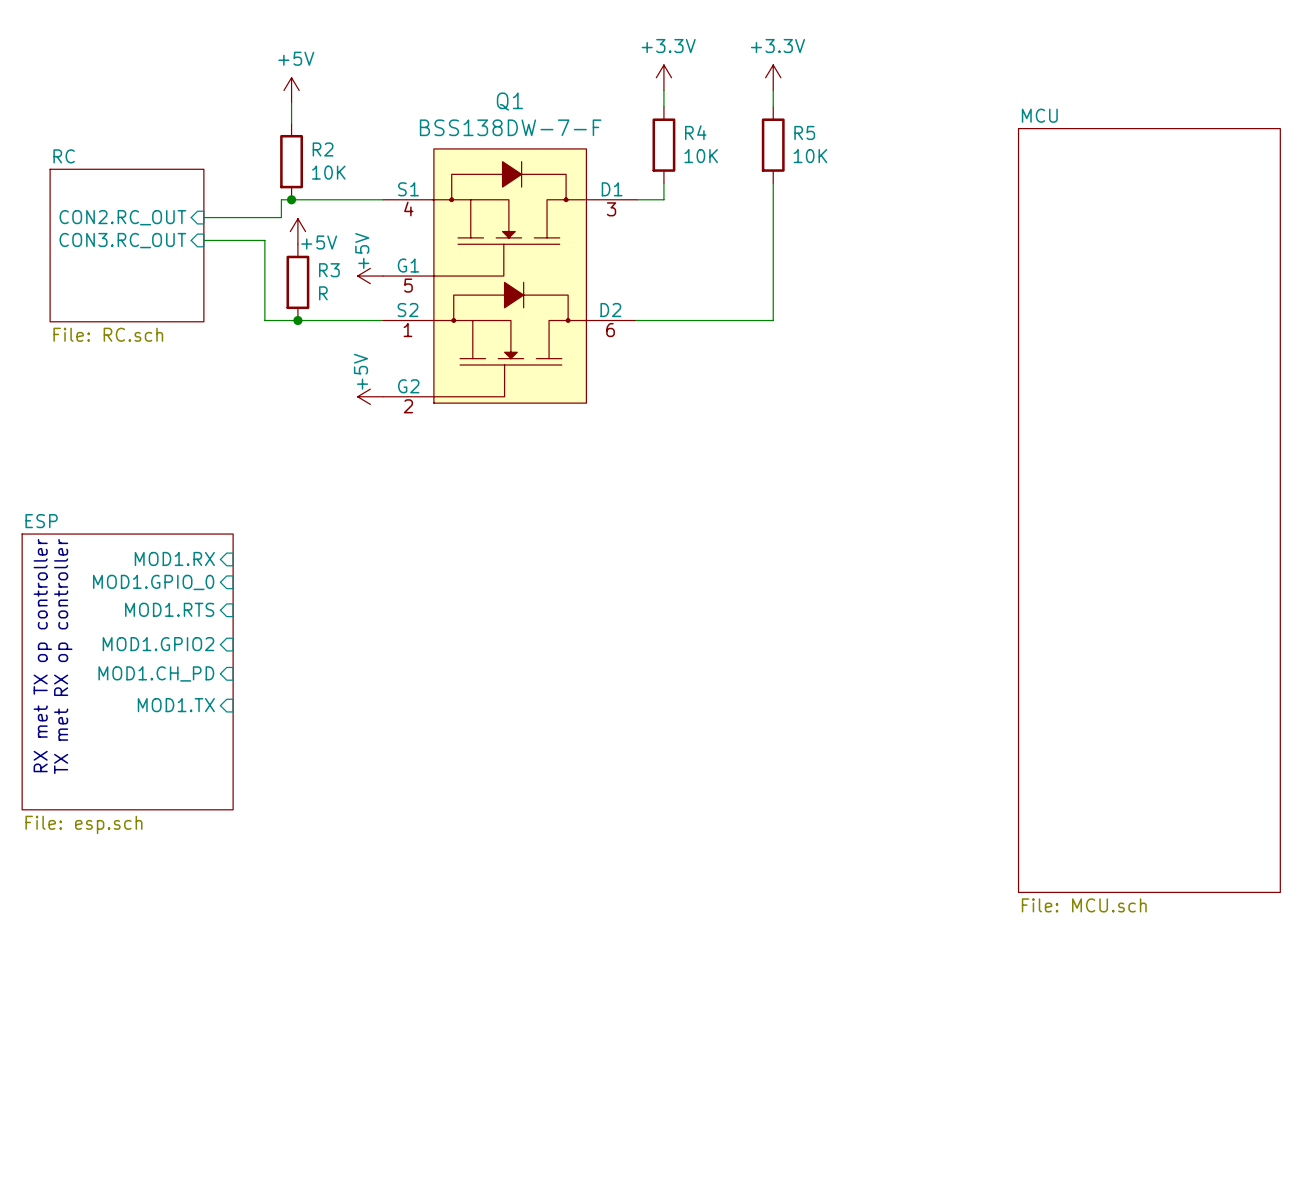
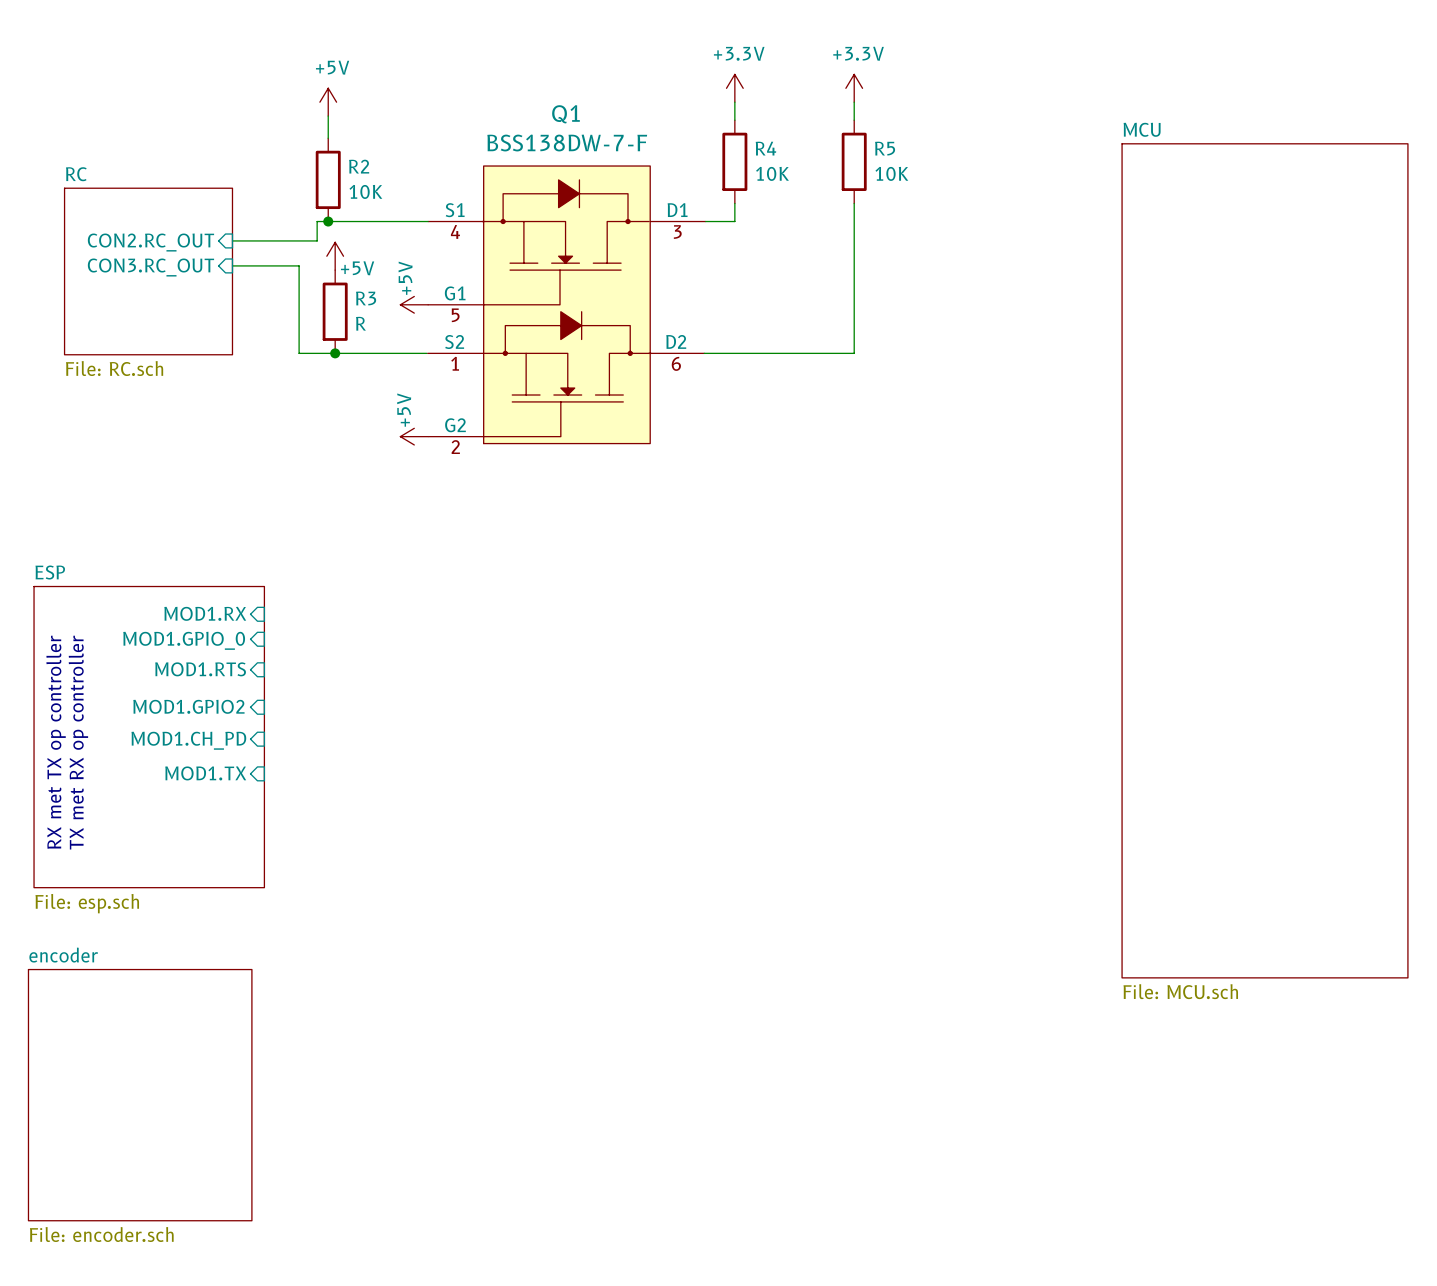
sheet encoder: none -> File: encoder.sch (140, 1095)

